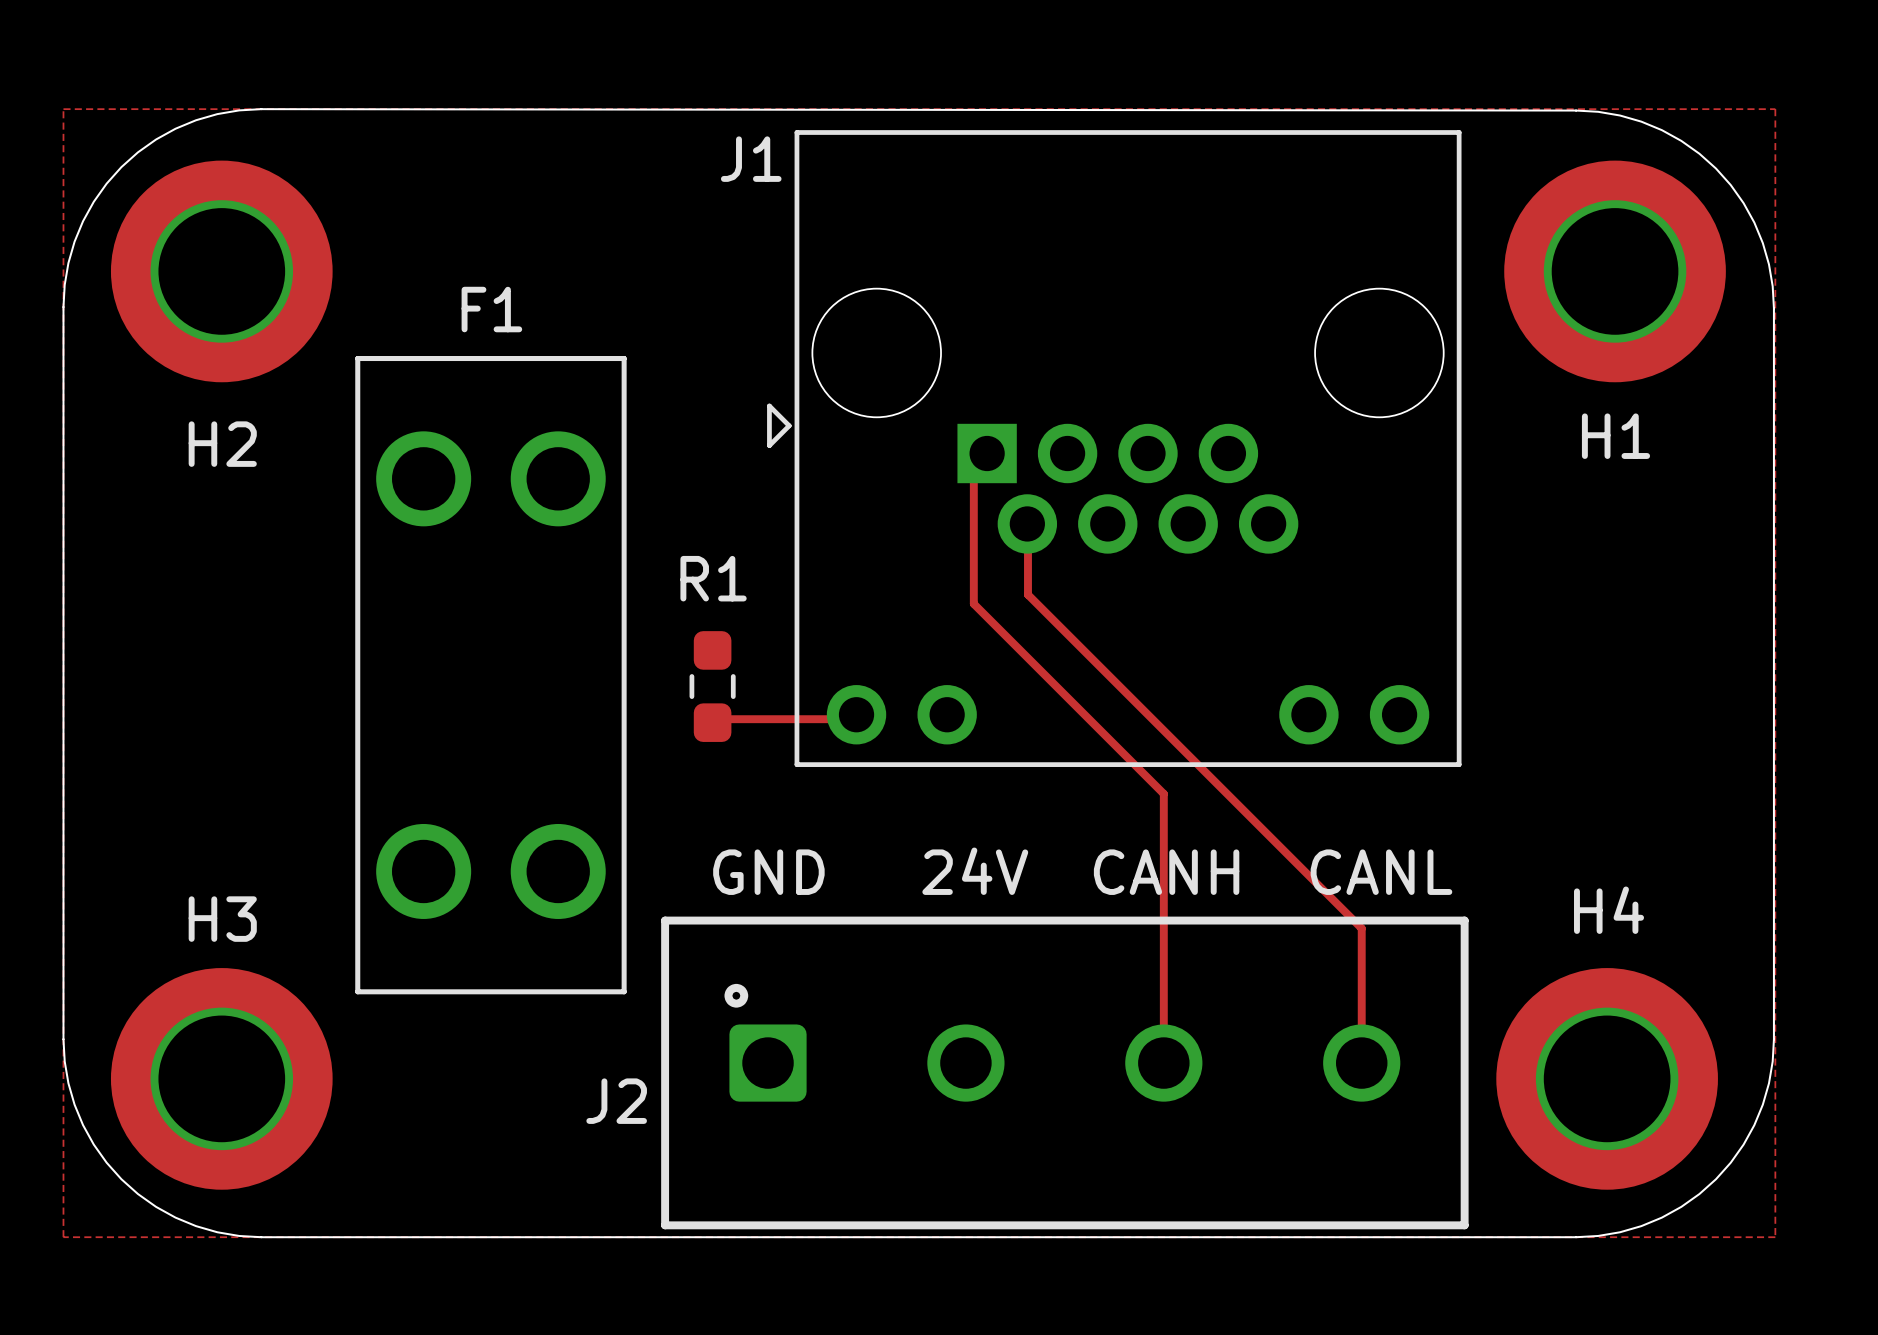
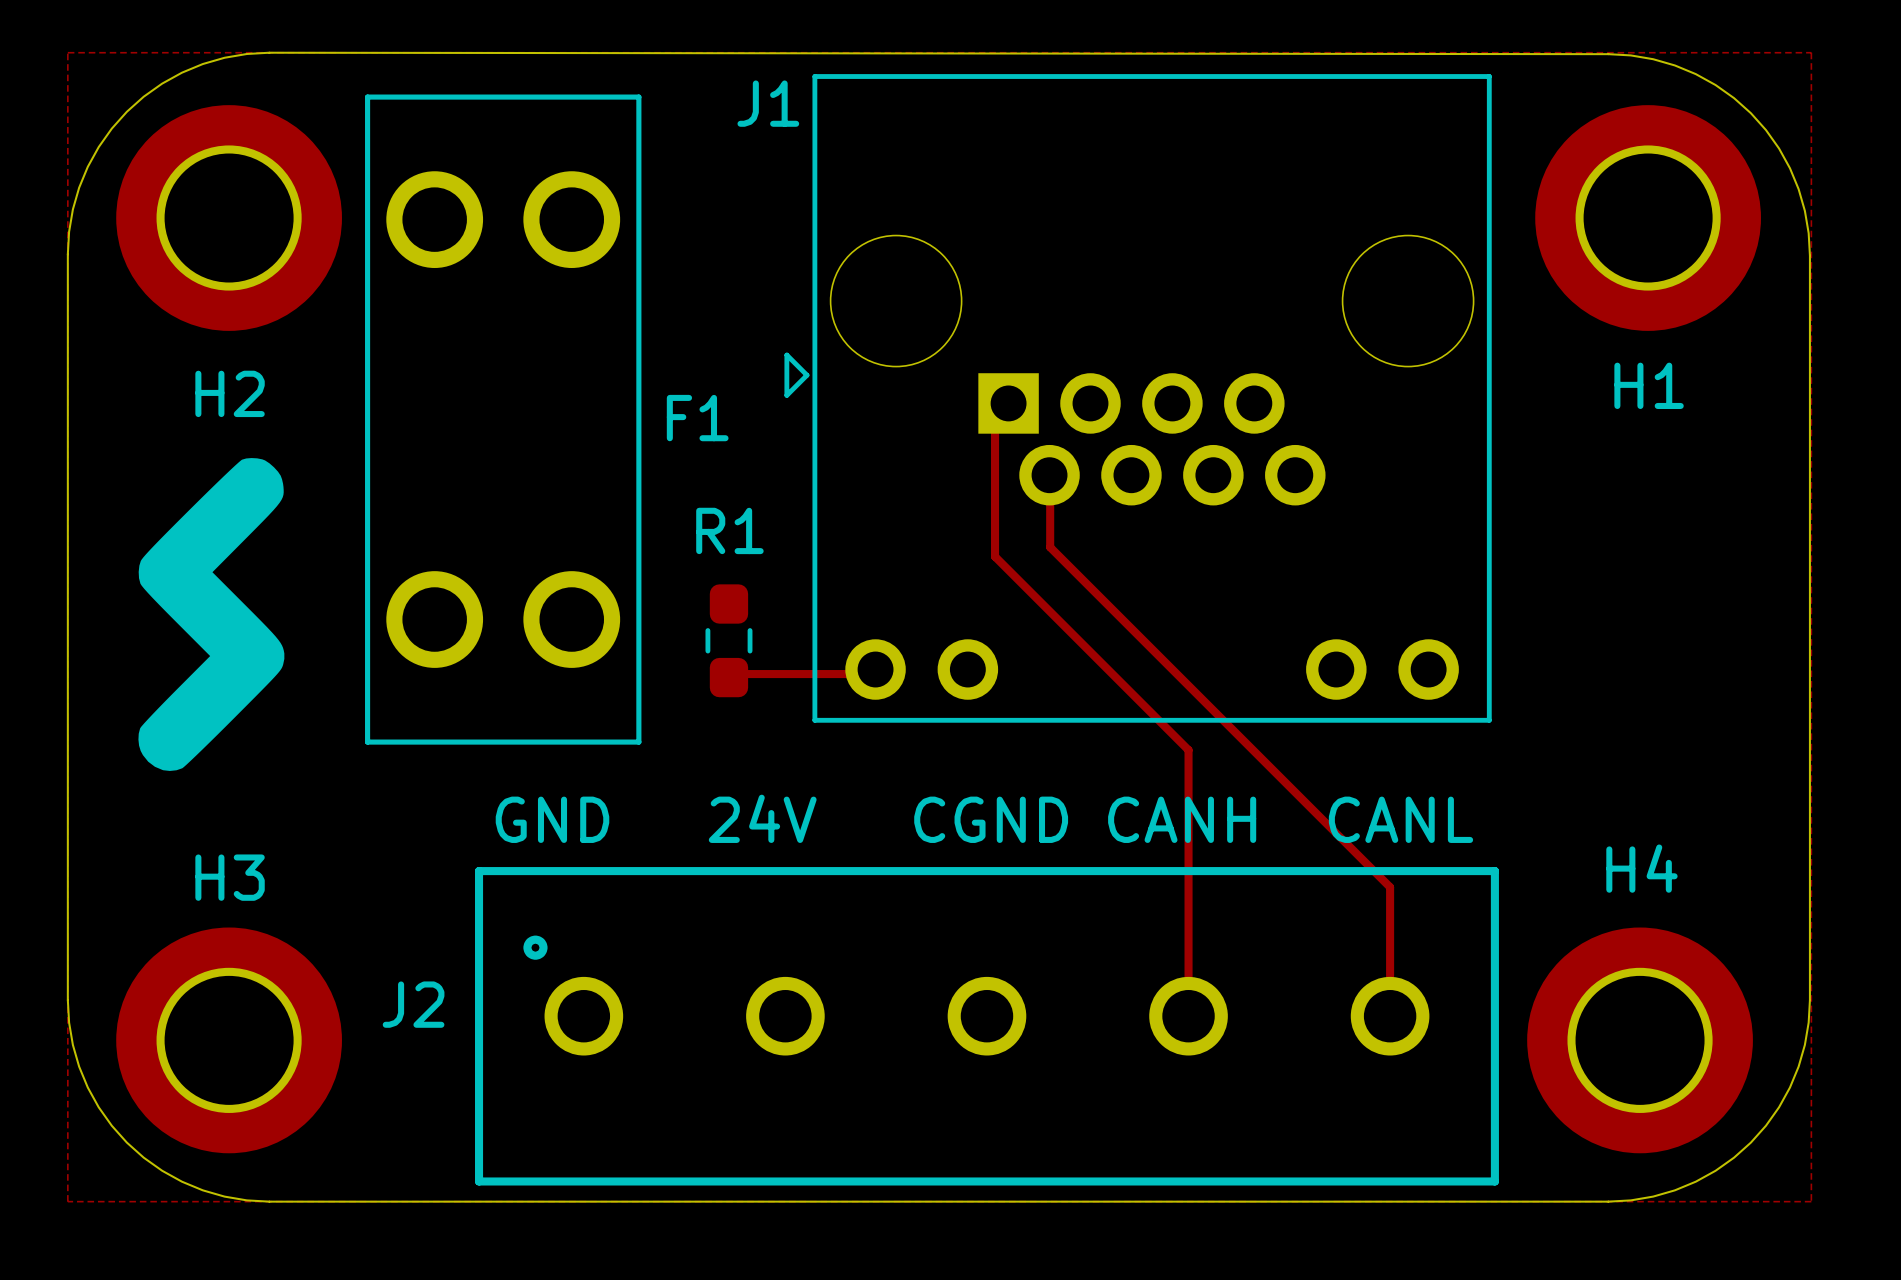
F1 name position: F1 (491, 309) -> F1 (697, 418)
drawing: none -> [138, 458, 285, 771]
F1 position: (490, 675) -> (503, 419)
text: GND 24V CANH CANL (1082, 871) -> GND 24V CGND CANH CANL (984, 818)
J2 footprint: [661, 916, 1469, 1230] -> [475, 867, 1499, 1186]
J2 name position: J2 (616, 1101) -> J2 (413, 1004)

